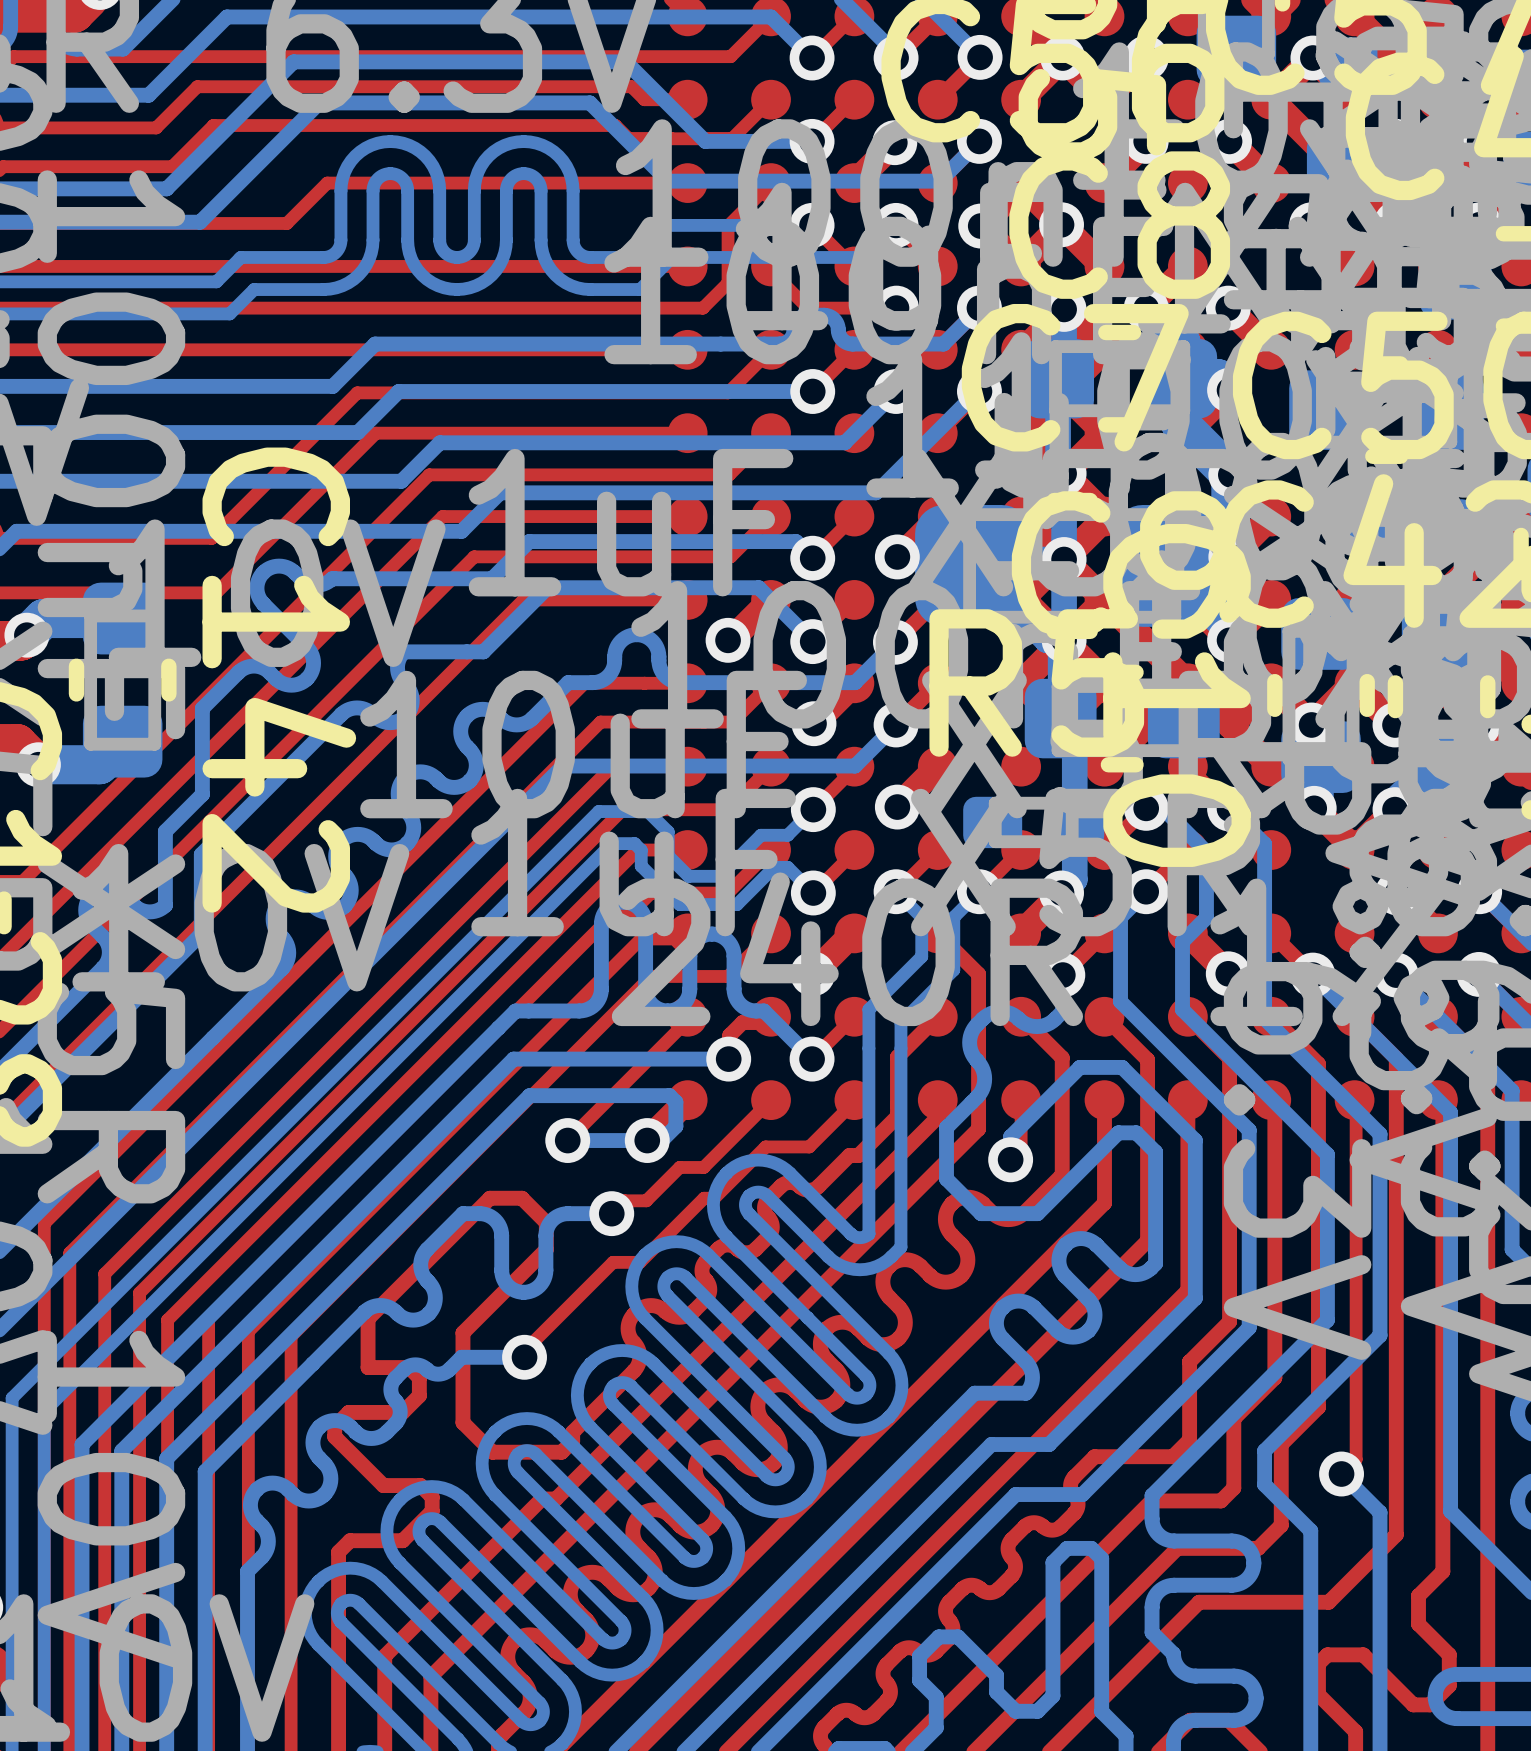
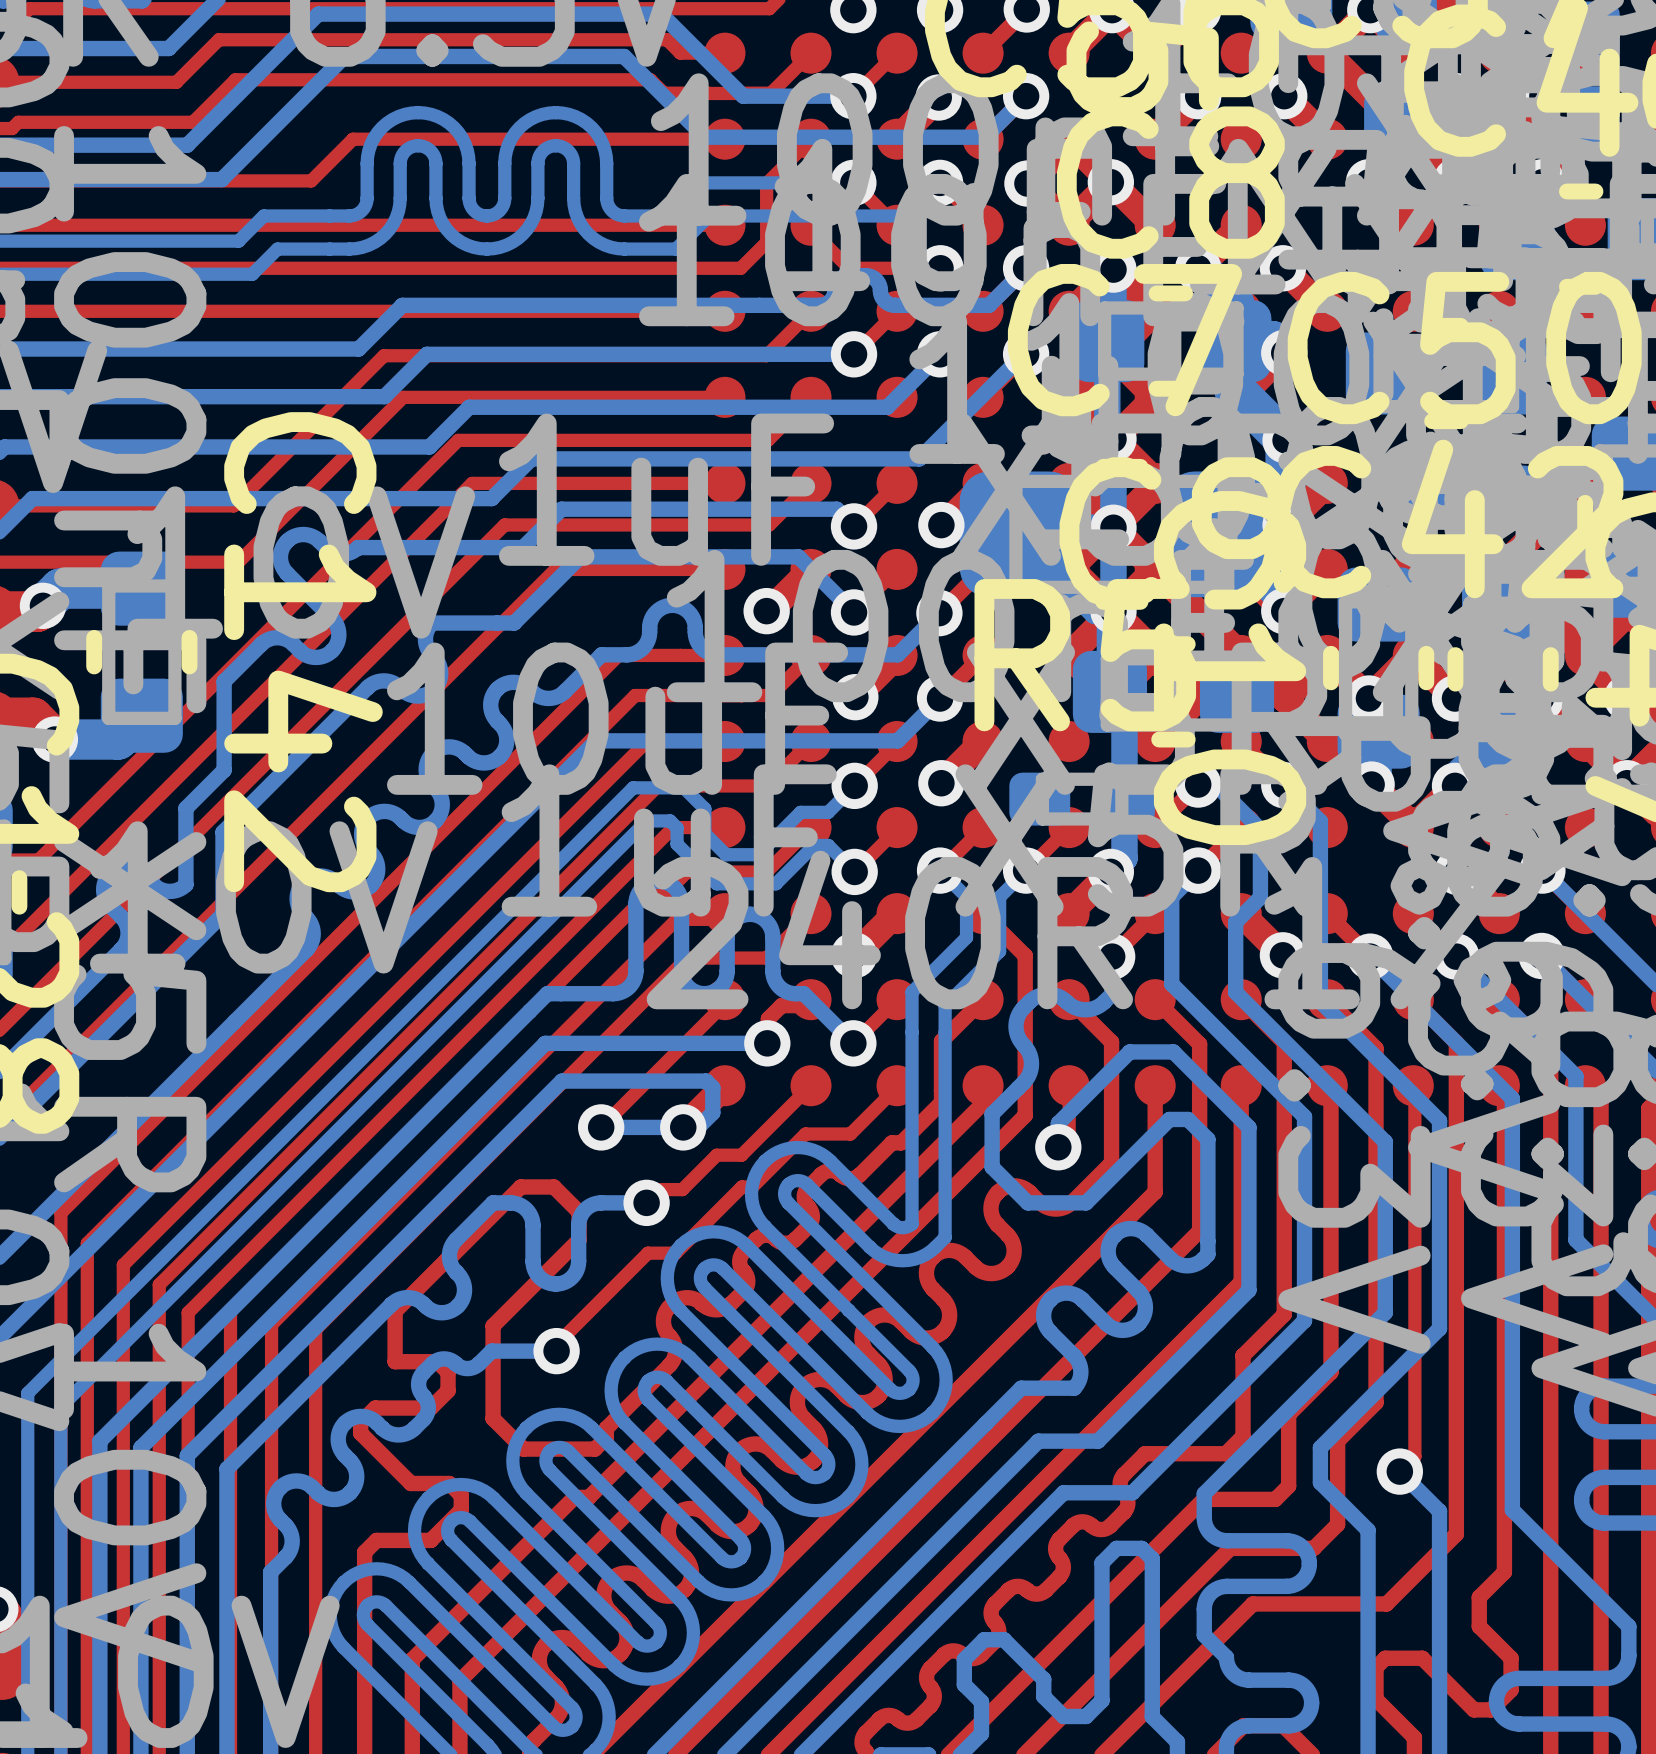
bottom track: (407, 206) (407, 188) (405, 182) (398, 175) (390, 173) (381, 175) (375, 182) (373, 188) (373, 206) -> (435, 163) (430, 150) (418, 145) (405, 150) (400, 163)
bottom track: (439, 206) (438, 178) (429, 160) (420, 151) (409, 145) (390, 141) (371, 145) (360, 151) (351, 160) (342, 178) (340, 206) -> (469, 163) (465, 144) (454, 127) (437, 116) (418, 112) (398, 116) (382, 127) (370, 144) (367, 163)
bottom track: (541, 206) (540, 188) (538, 182) (532, 175) (523, 173) (515, 175) (508, 182) (506, 188) (506, 206) -> (573, 163) (568, 150) (555, 145) (543, 150) (537, 163)
bottom track: (573, 206) (571, 178) (562, 160) (548, 148) (536, 143) (523, 141) (510, 143) (499, 148) (484, 160) (476, 178) (474, 206) -> (606, 163) (602, 144) (591, 127) (575, 116) (555, 112) (536, 116) (519, 127) (508, 144) (504, 163)

